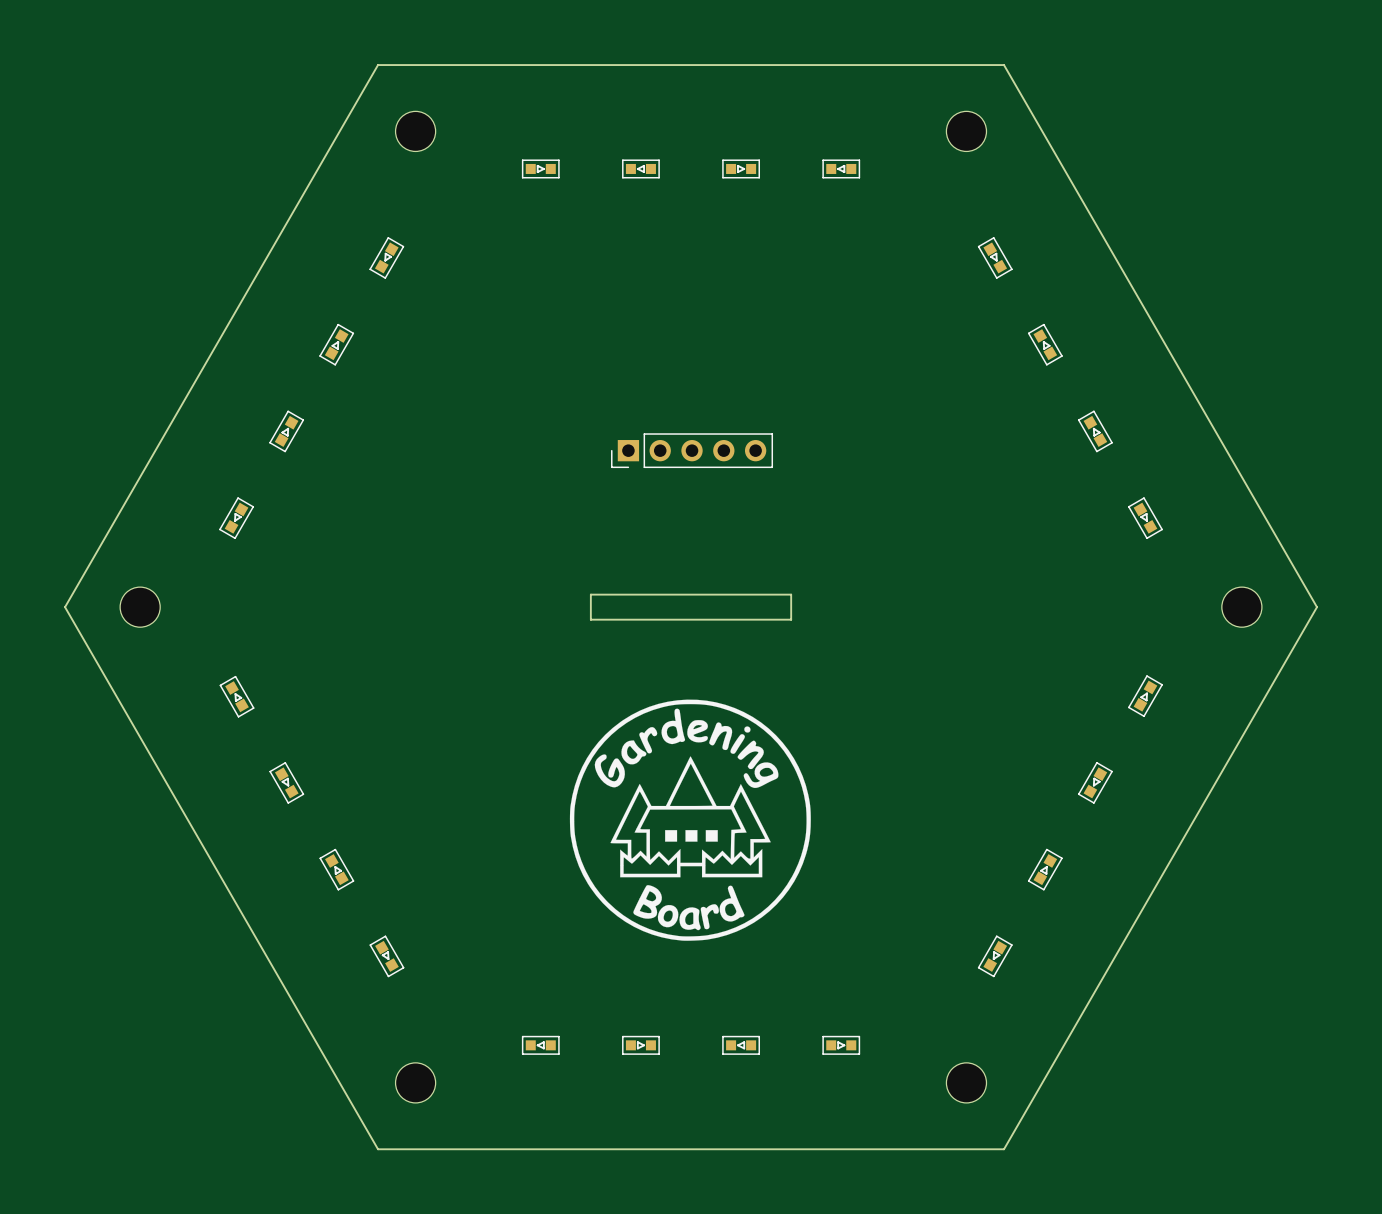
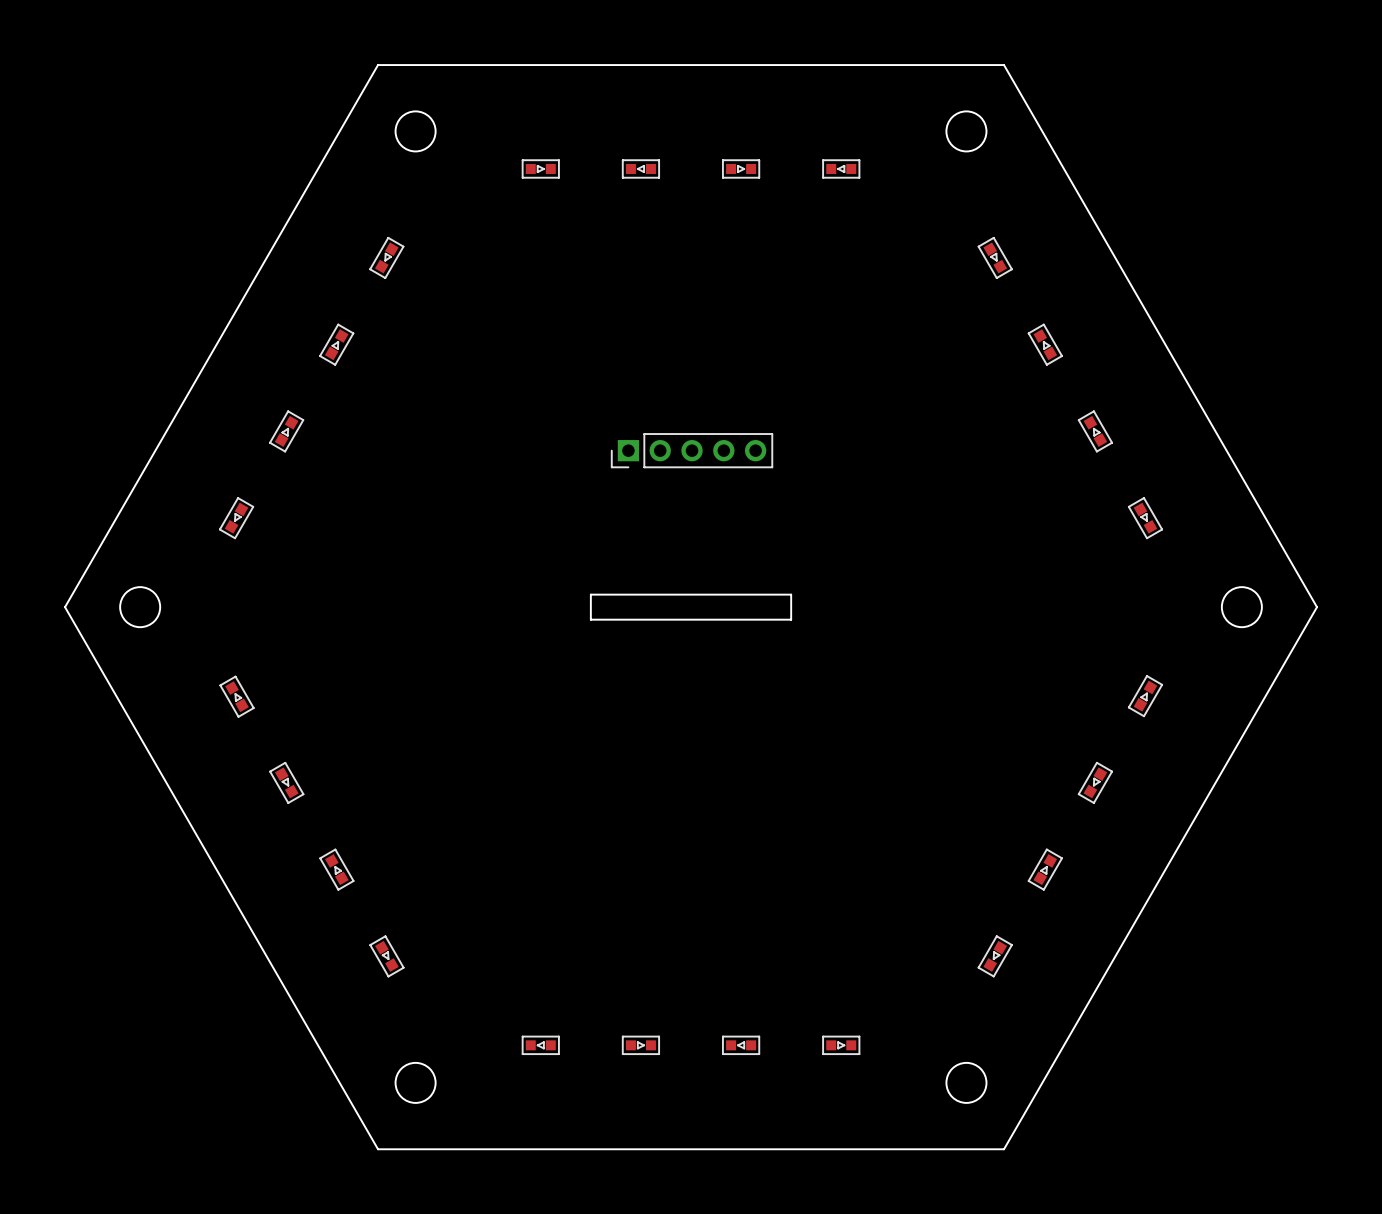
drawing: [569, 699, 811, 941] -> none

